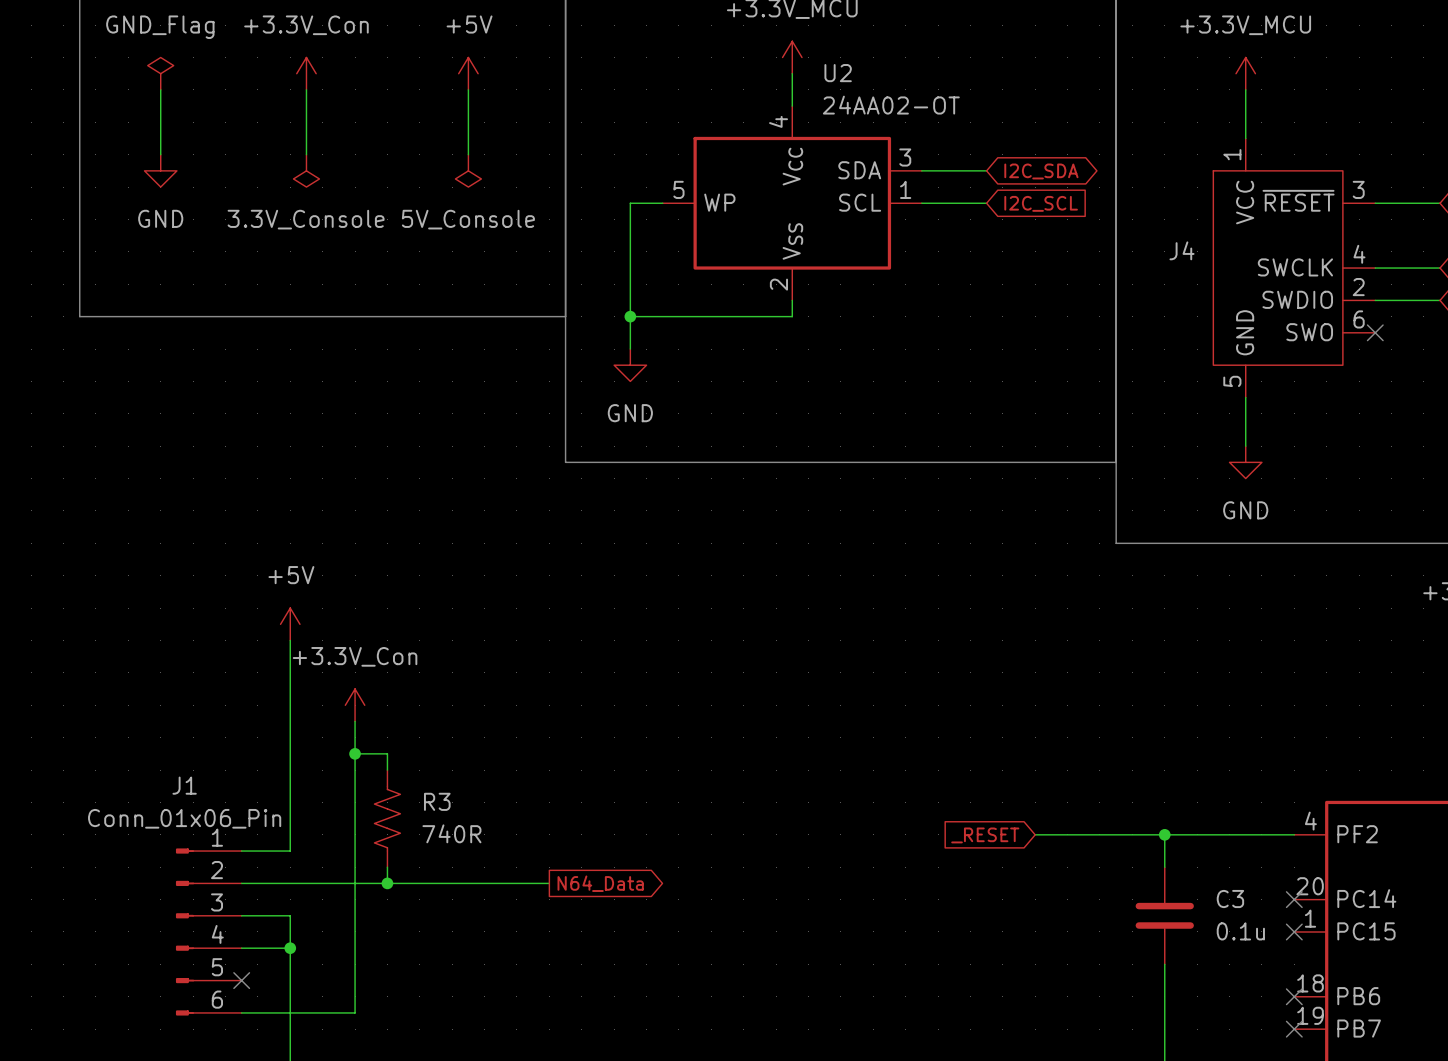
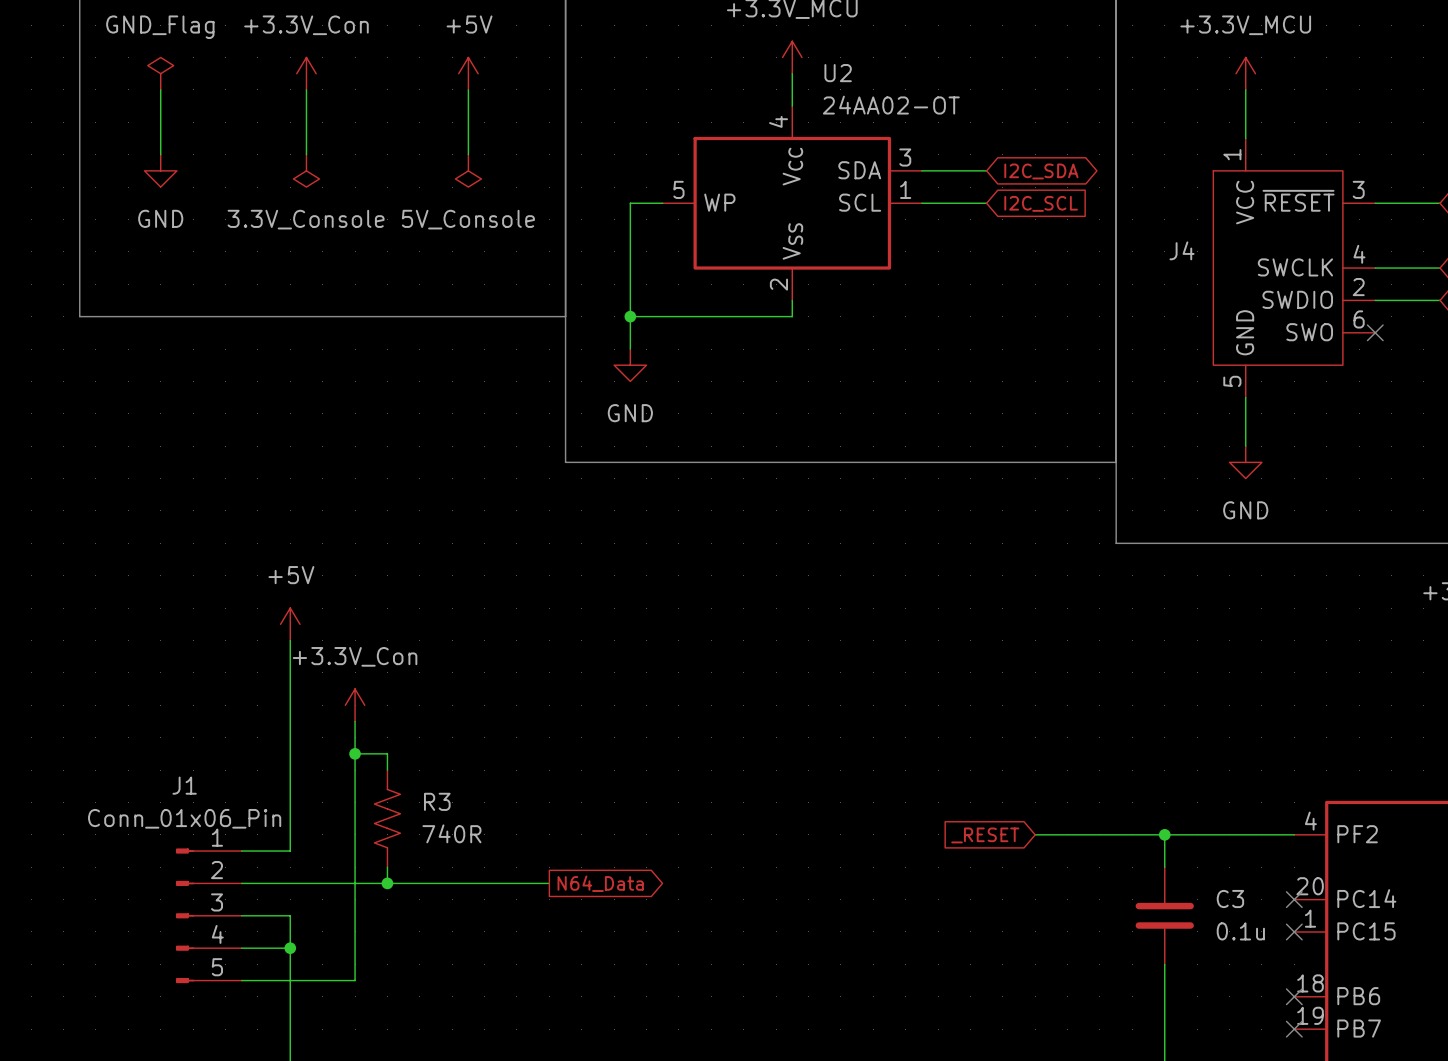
J1 symbol: [175, 848, 242, 1016] -> [175, 848, 242, 984]
no-connect mark: (241, 980) -> none
wire: (355, 980) (355, 1012) (241, 1012) -> (355, 980) (241, 980)

